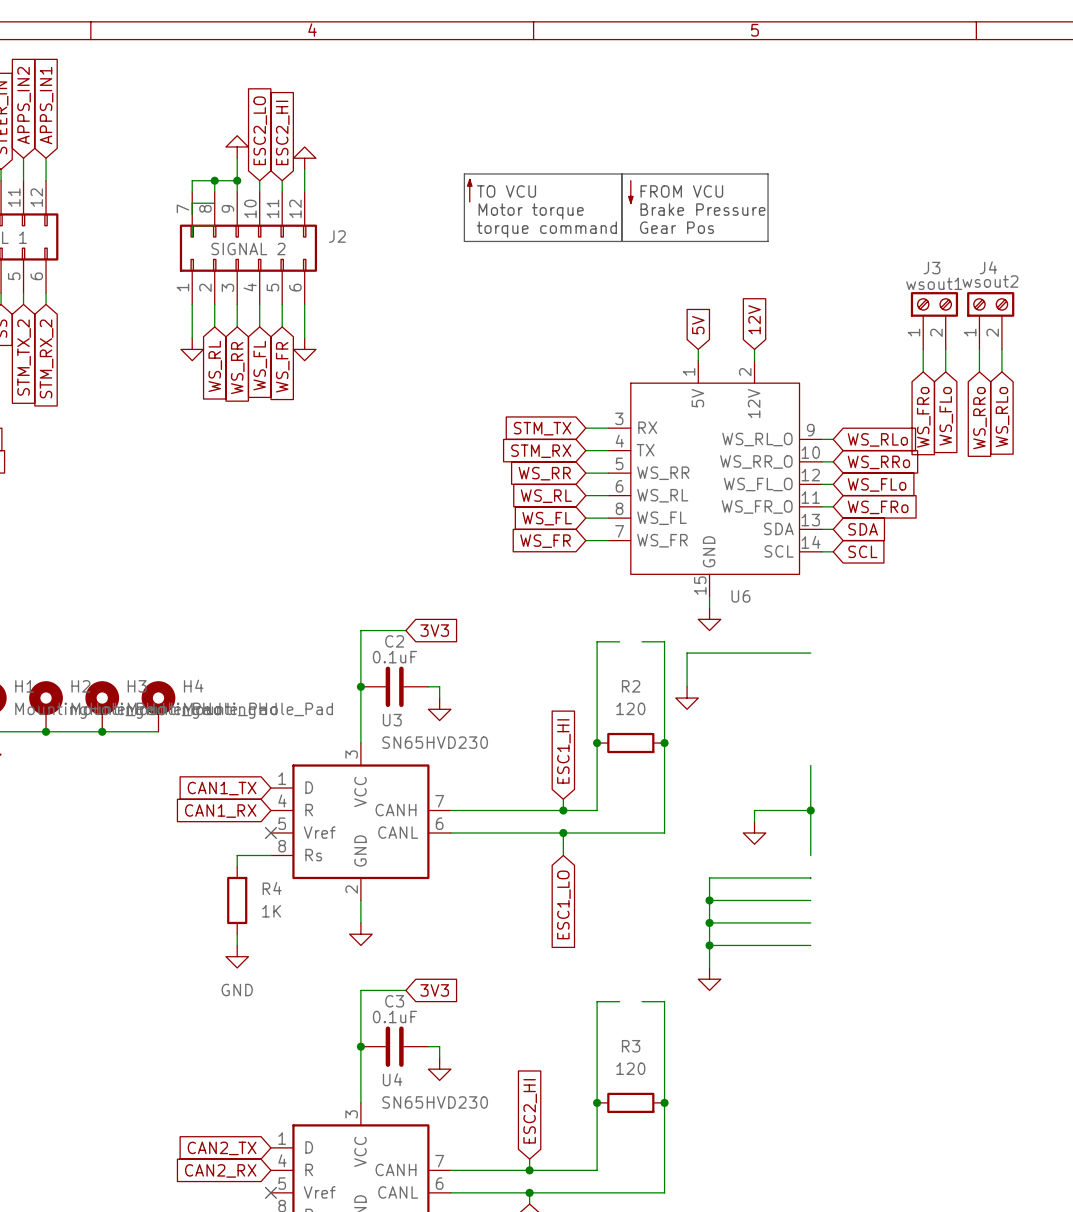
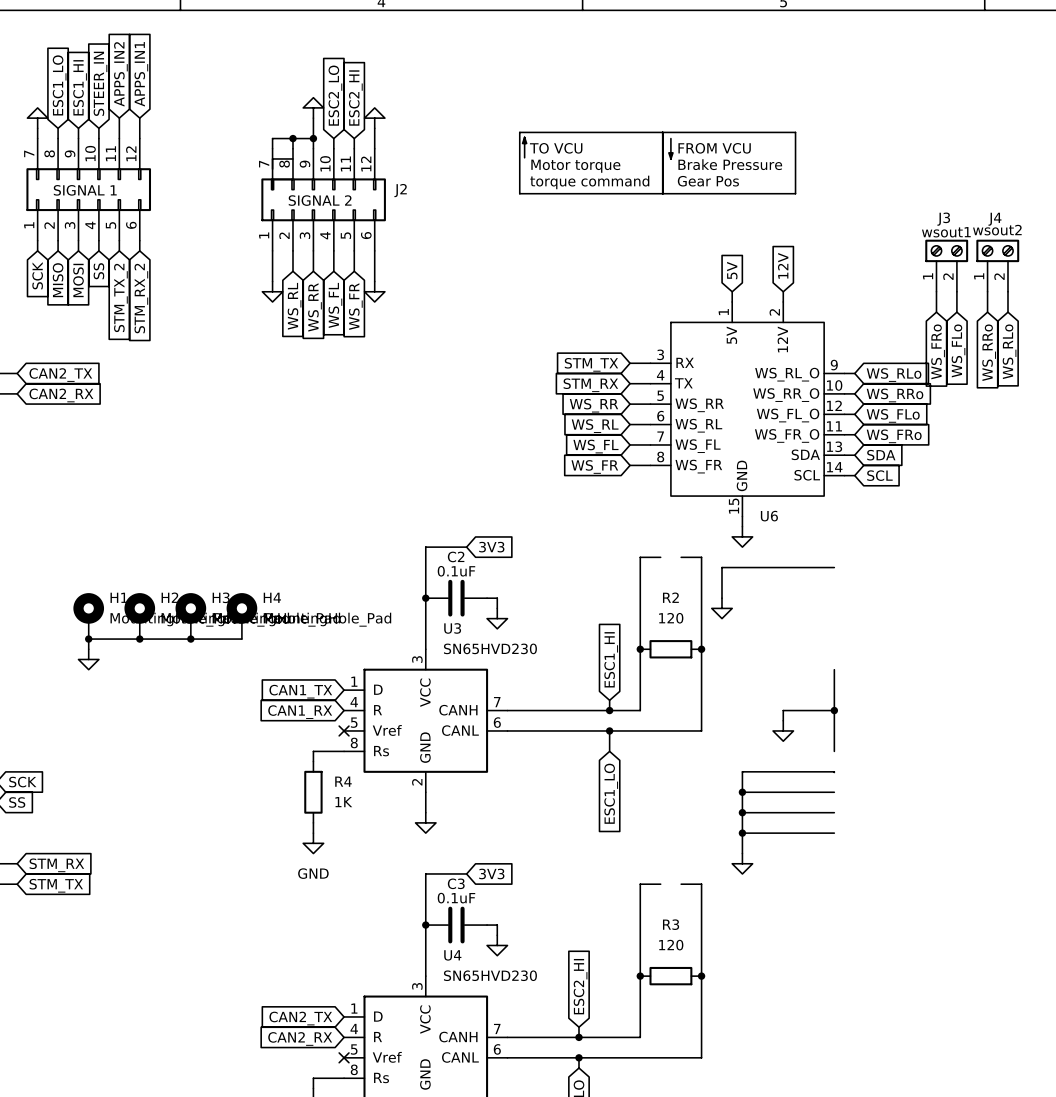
U6 pin number: 8 (619, 508) -> 7 (660, 436)
U6 pin number: 7 (619, 531) -> 8 (660, 456)

